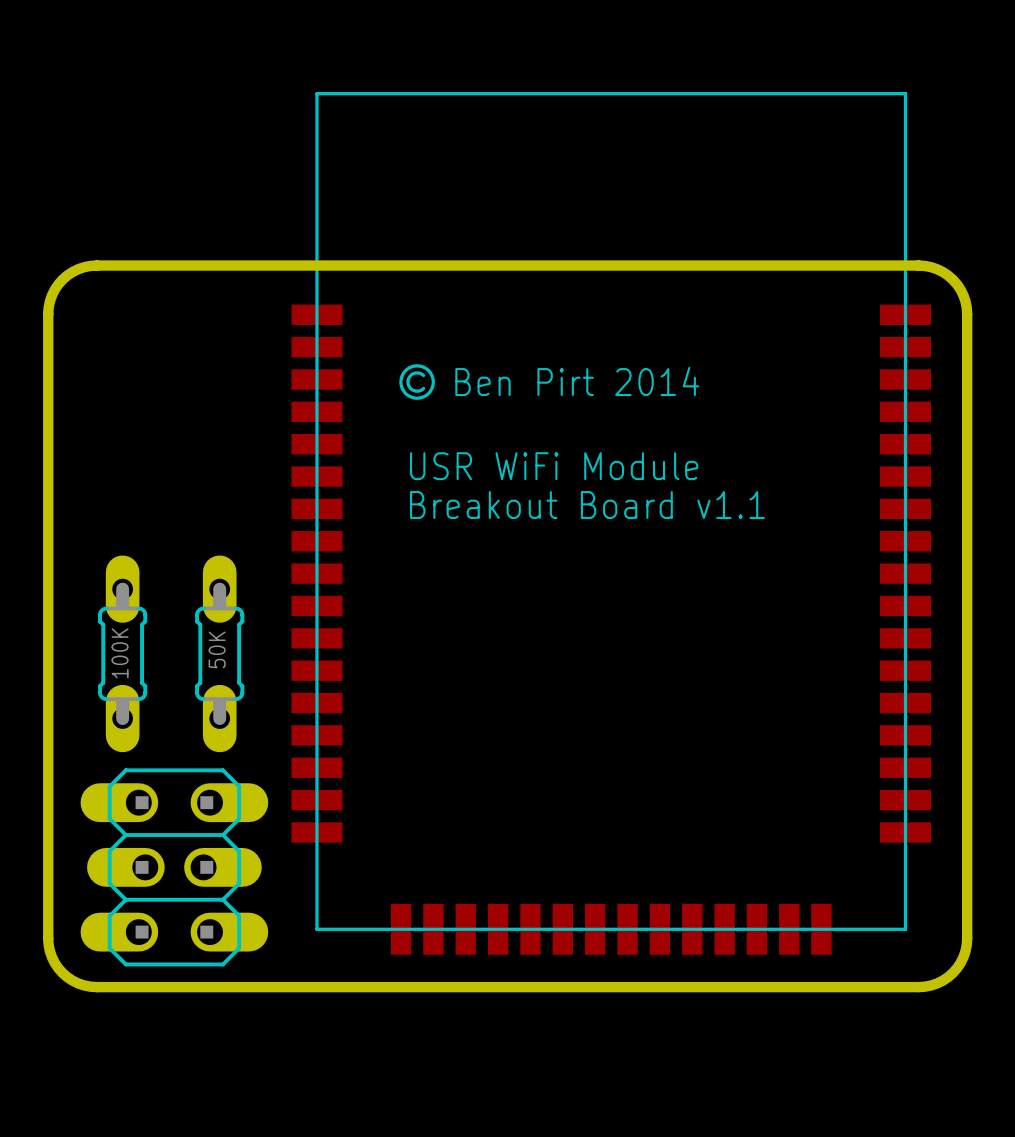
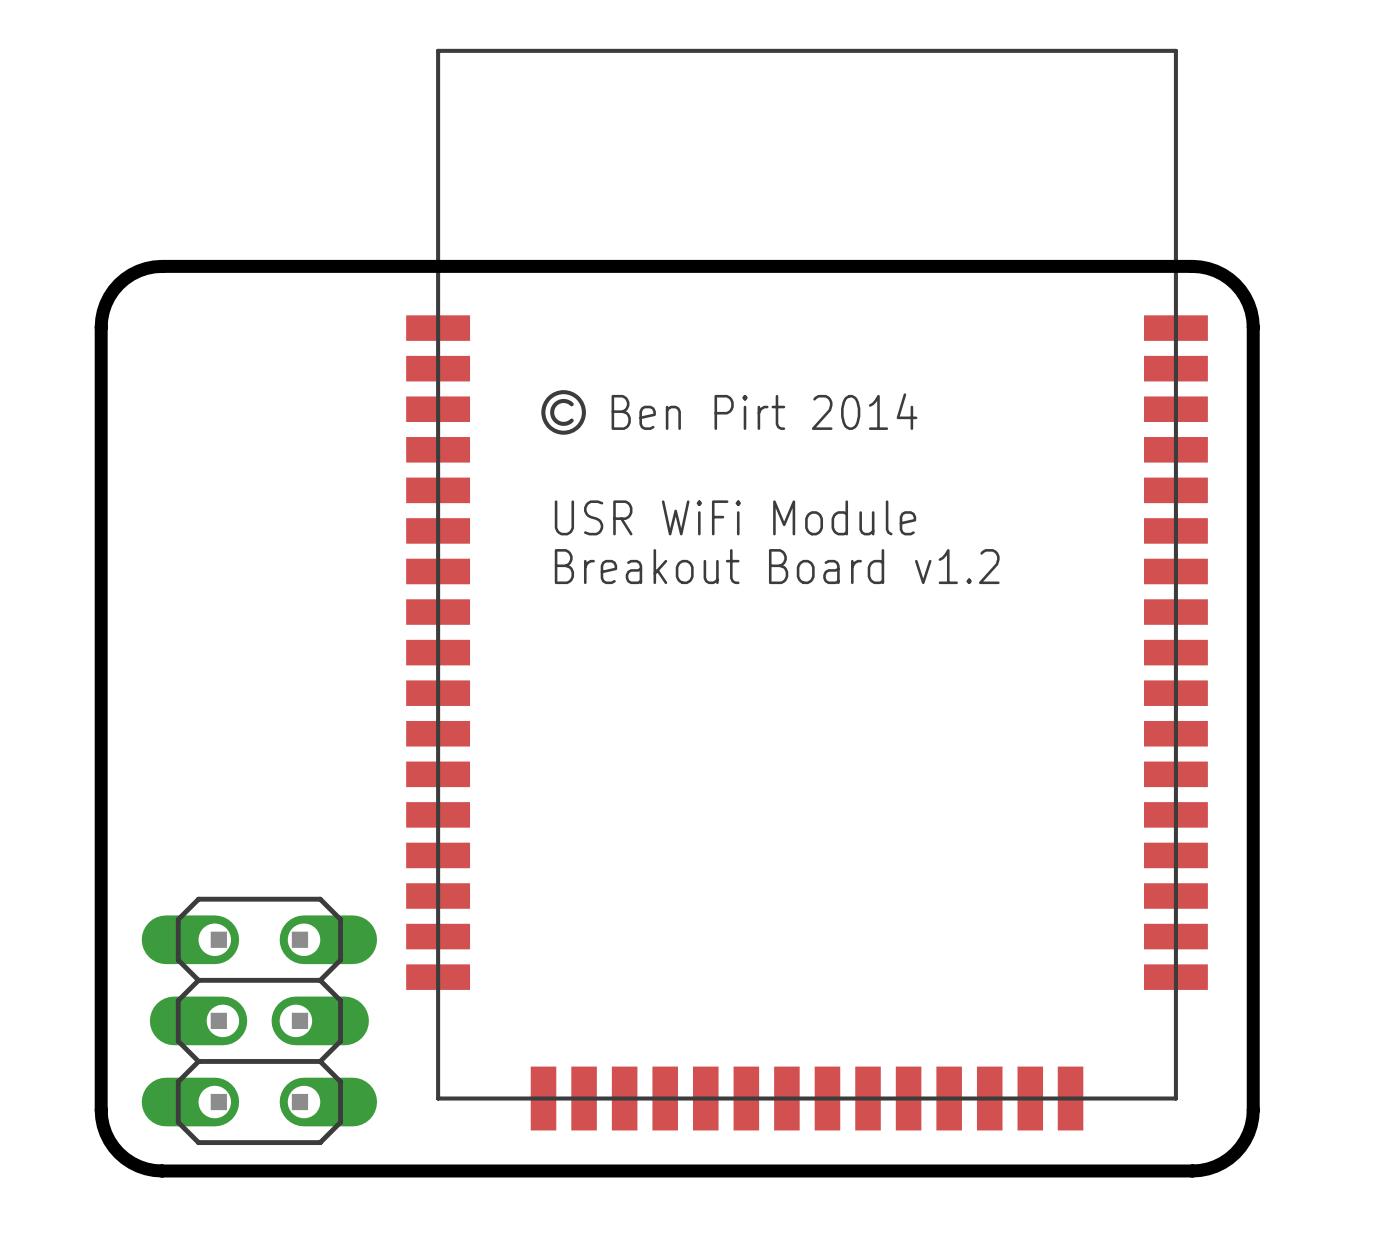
text: Breakout Board v1.1 (587, 504) -> Breakout Board v1.2 (777, 566)
part: 100K (122, 653) -> none
part: 50K (219, 653) -> none

